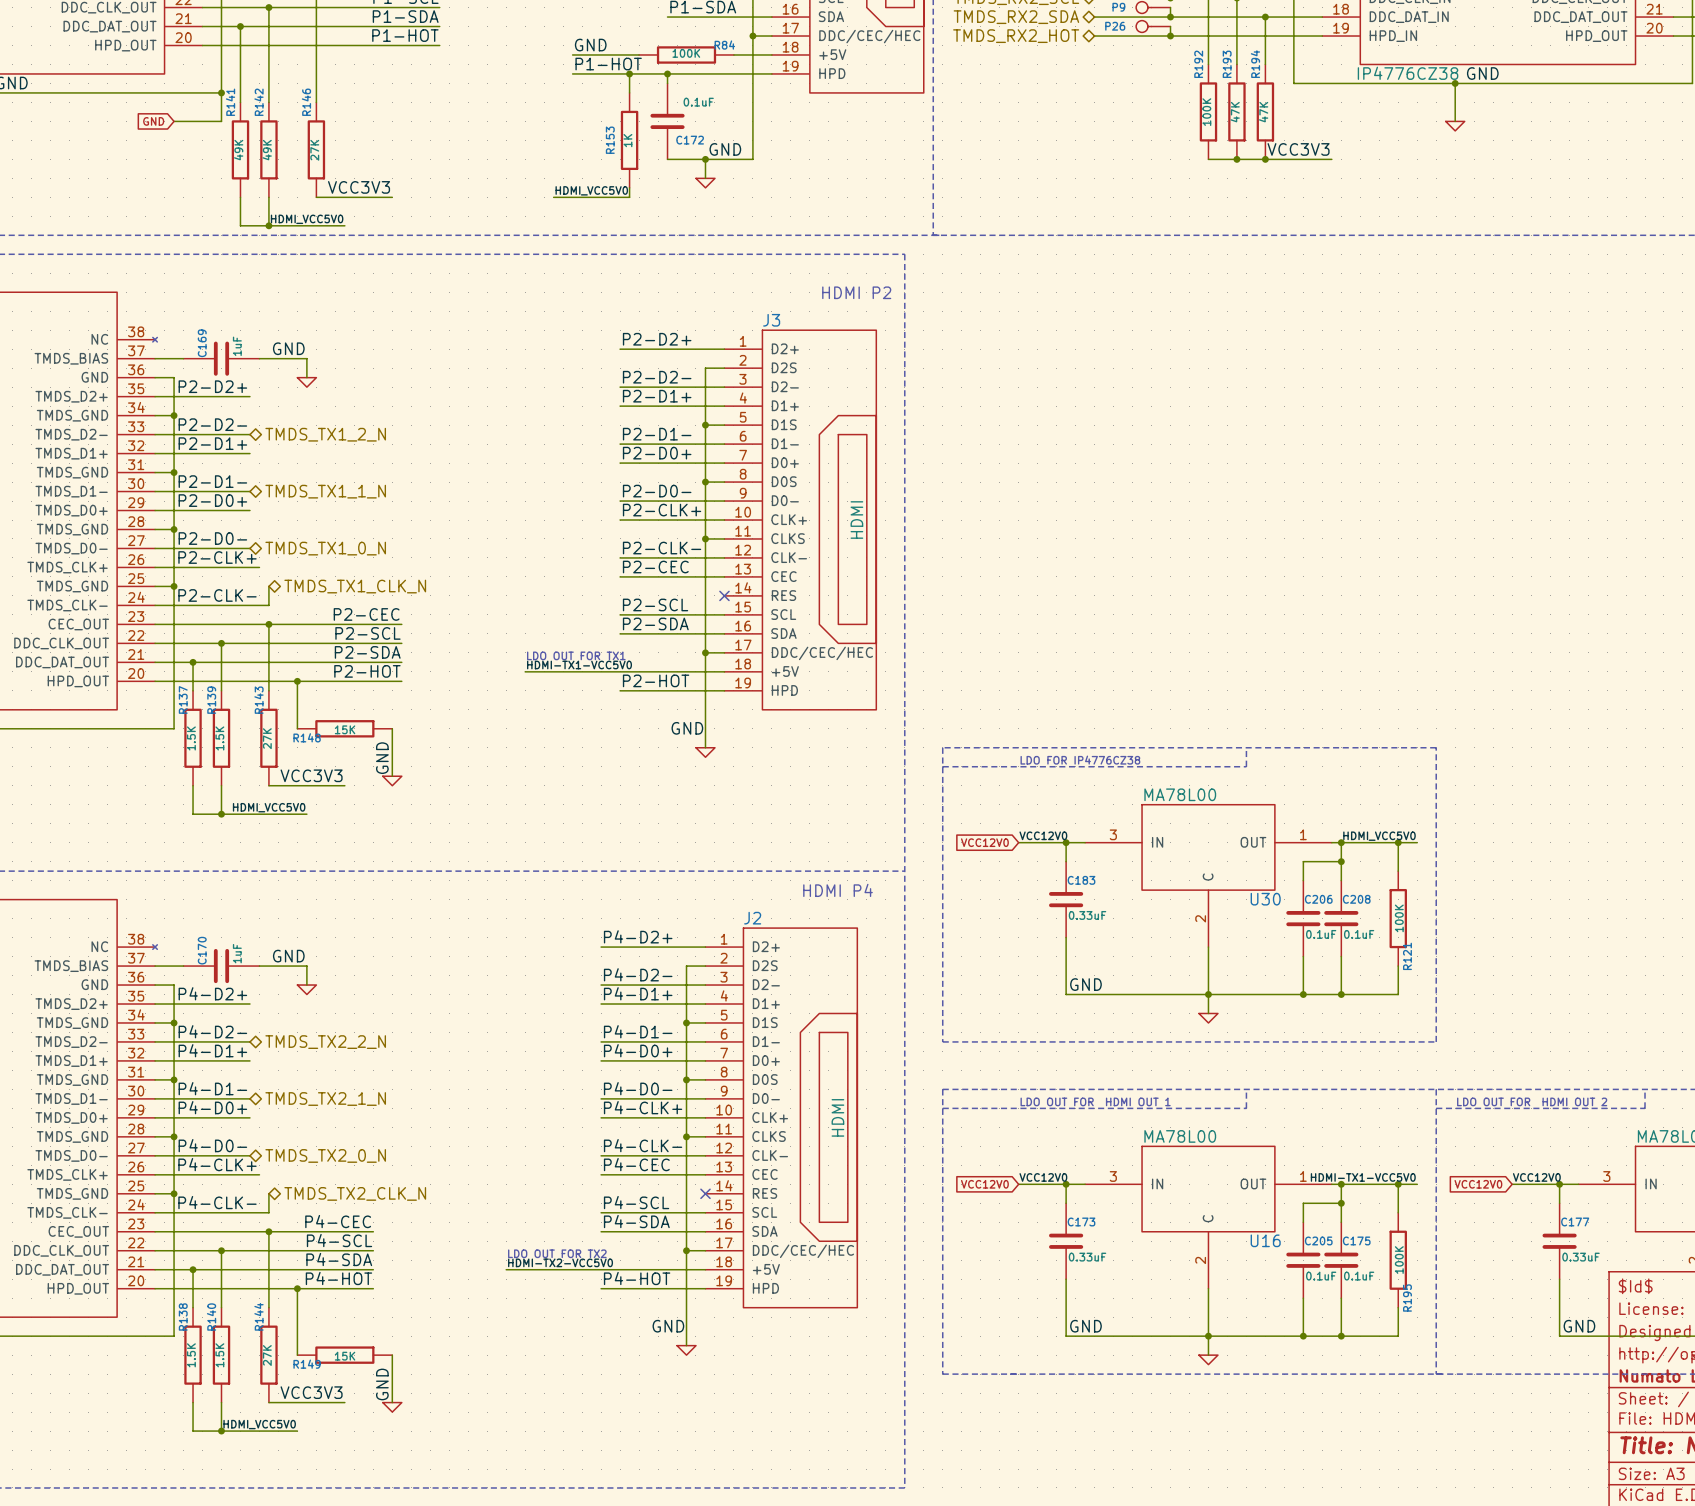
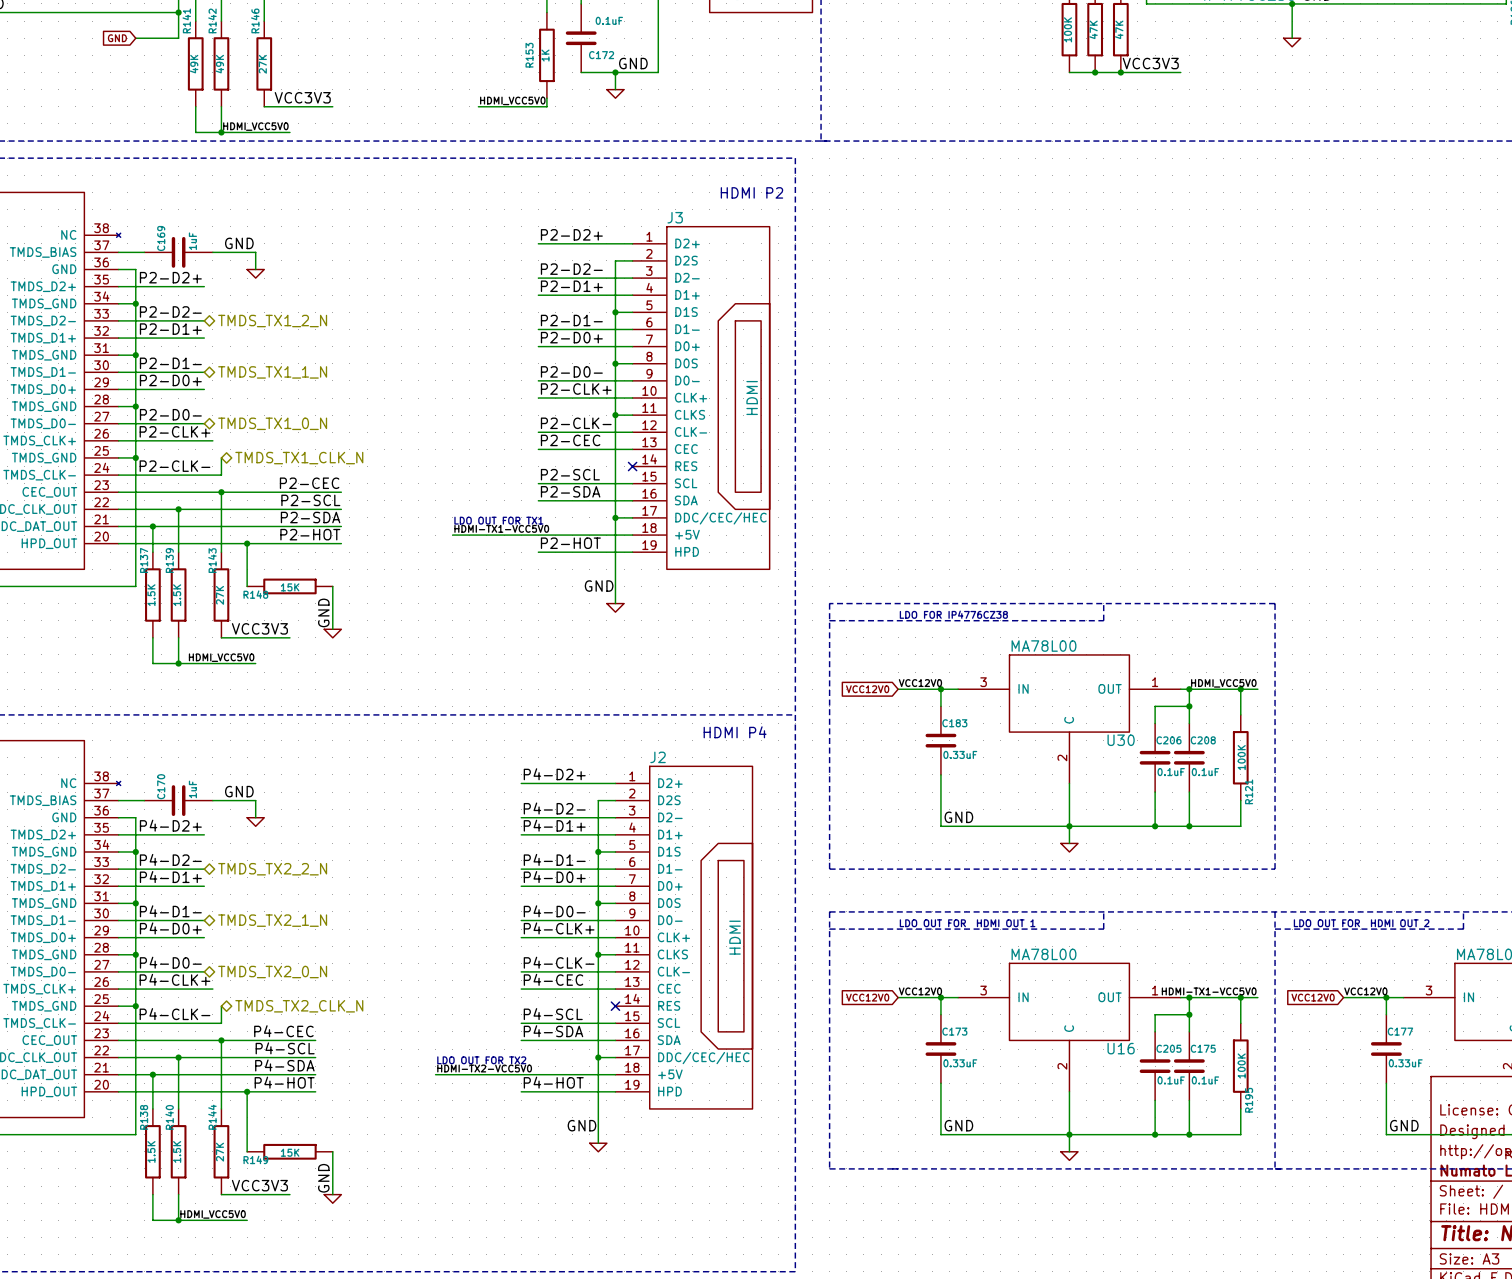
title block: $Id$ (1635, 1286) -> none

